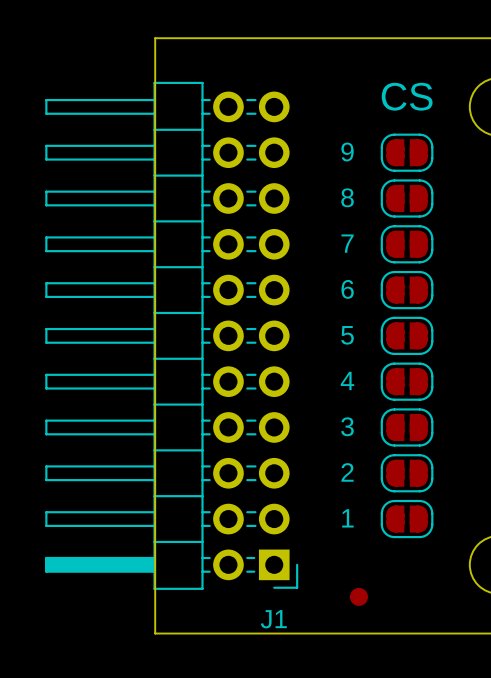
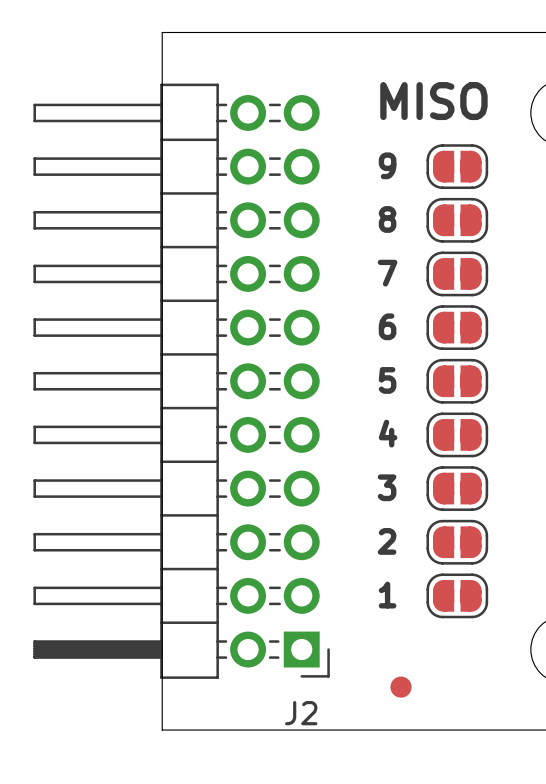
text: none -> MISO (433, 101)
text: CS (407, 96) -> none
J1 name: J1 (273, 619) -> J2 (301, 713)

